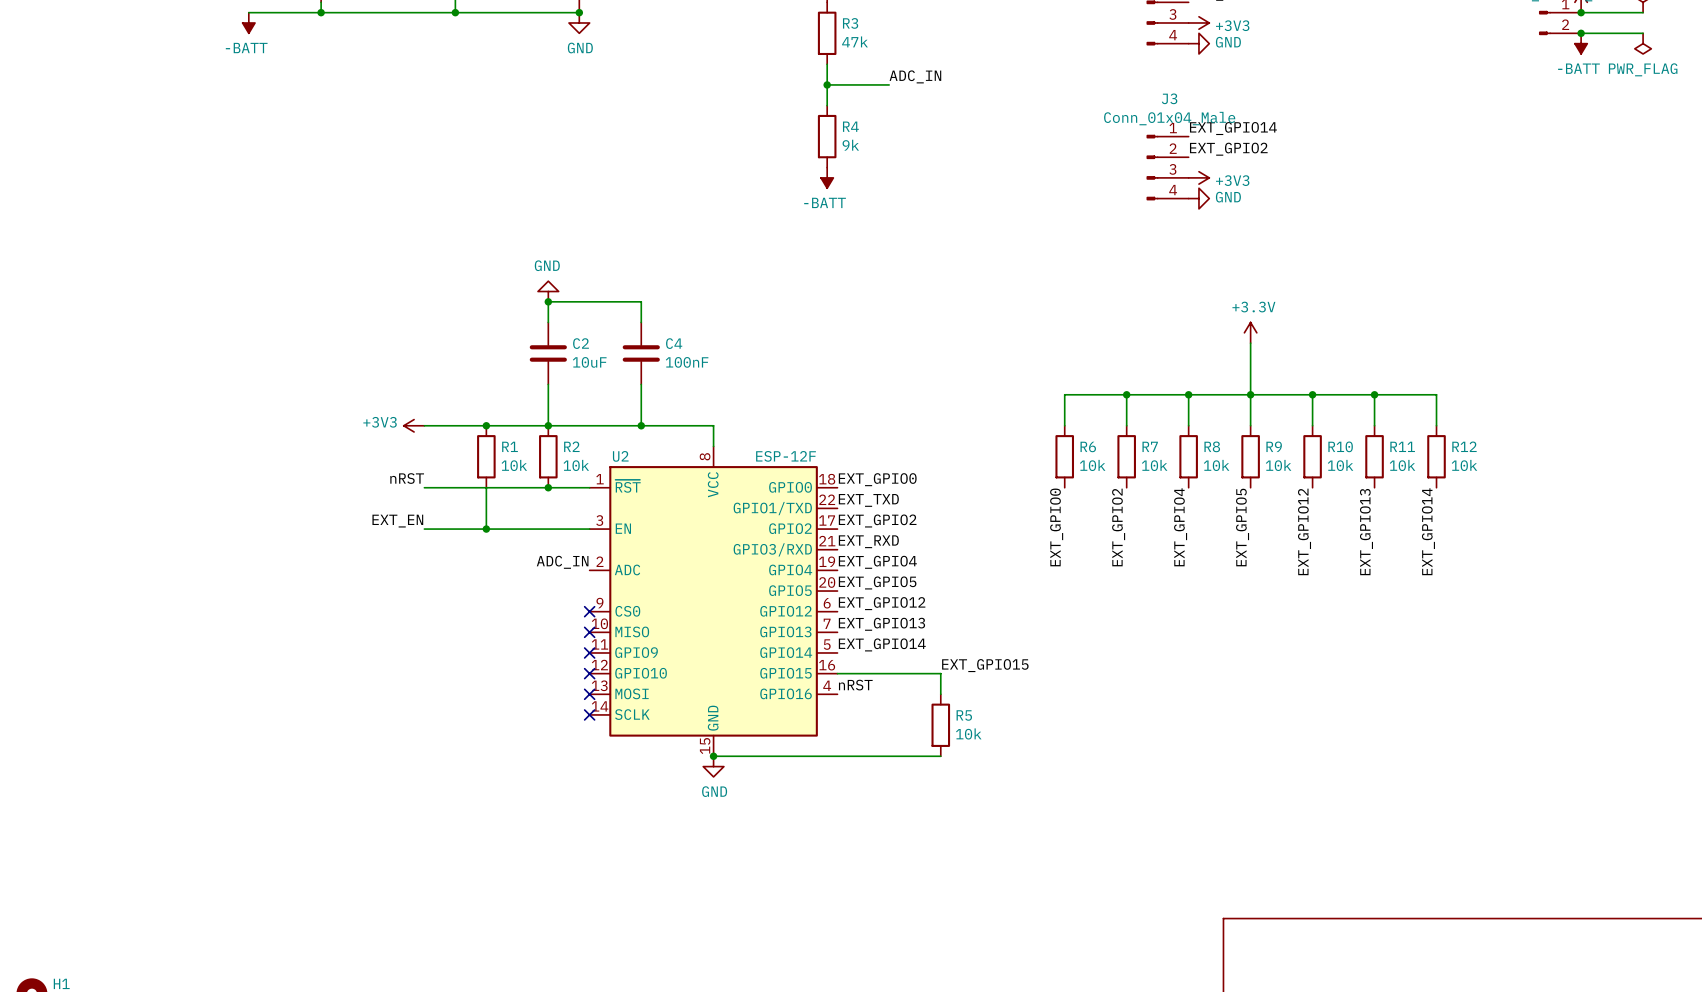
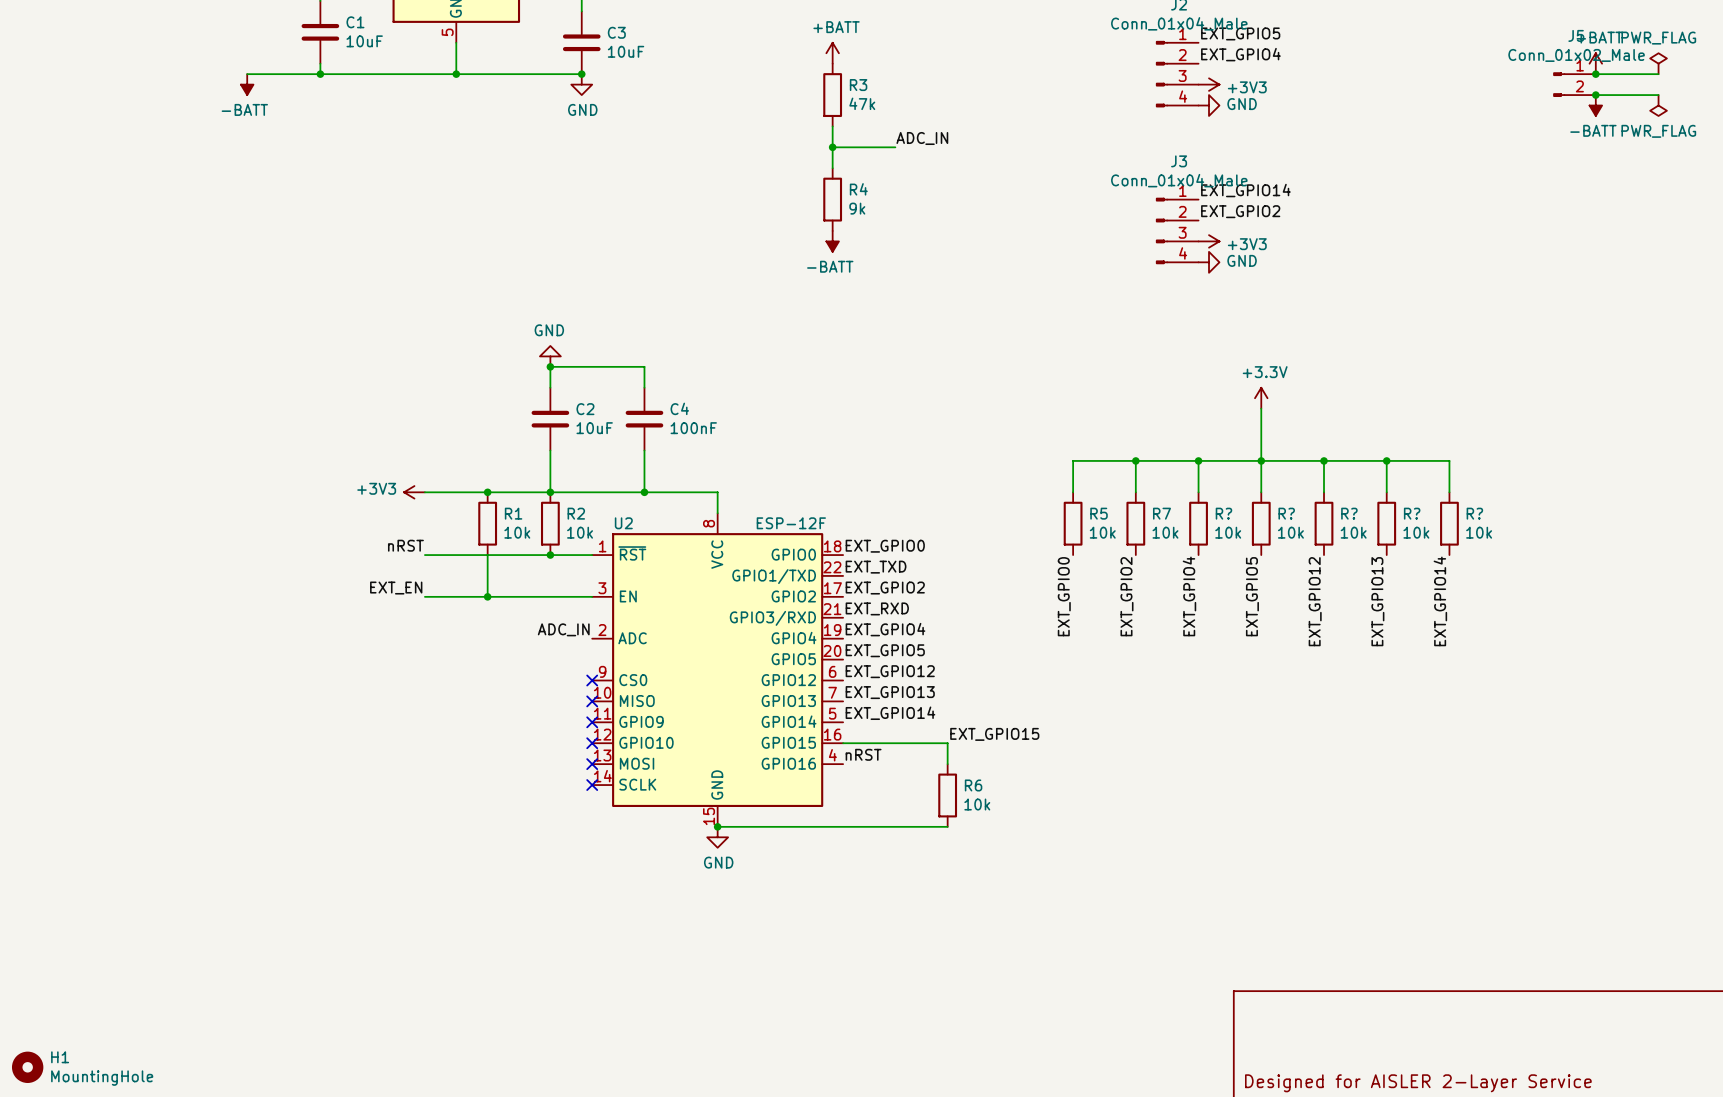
R6 name: R6 (1088, 446) -> R5 (1099, 513)
R8 name: R8 (1212, 446) -> R? (1223, 513)
R9 name: R9 (1274, 446) -> R? (1286, 513)
R10 name: R10 (1340, 446) -> R? (1349, 513)
R11 name: R11 (1402, 446) -> R? (1412, 513)
R12 name: R12 (1464, 446) -> R? (1474, 513)
R5 name: R5 (964, 715) -> R6 (973, 785)

